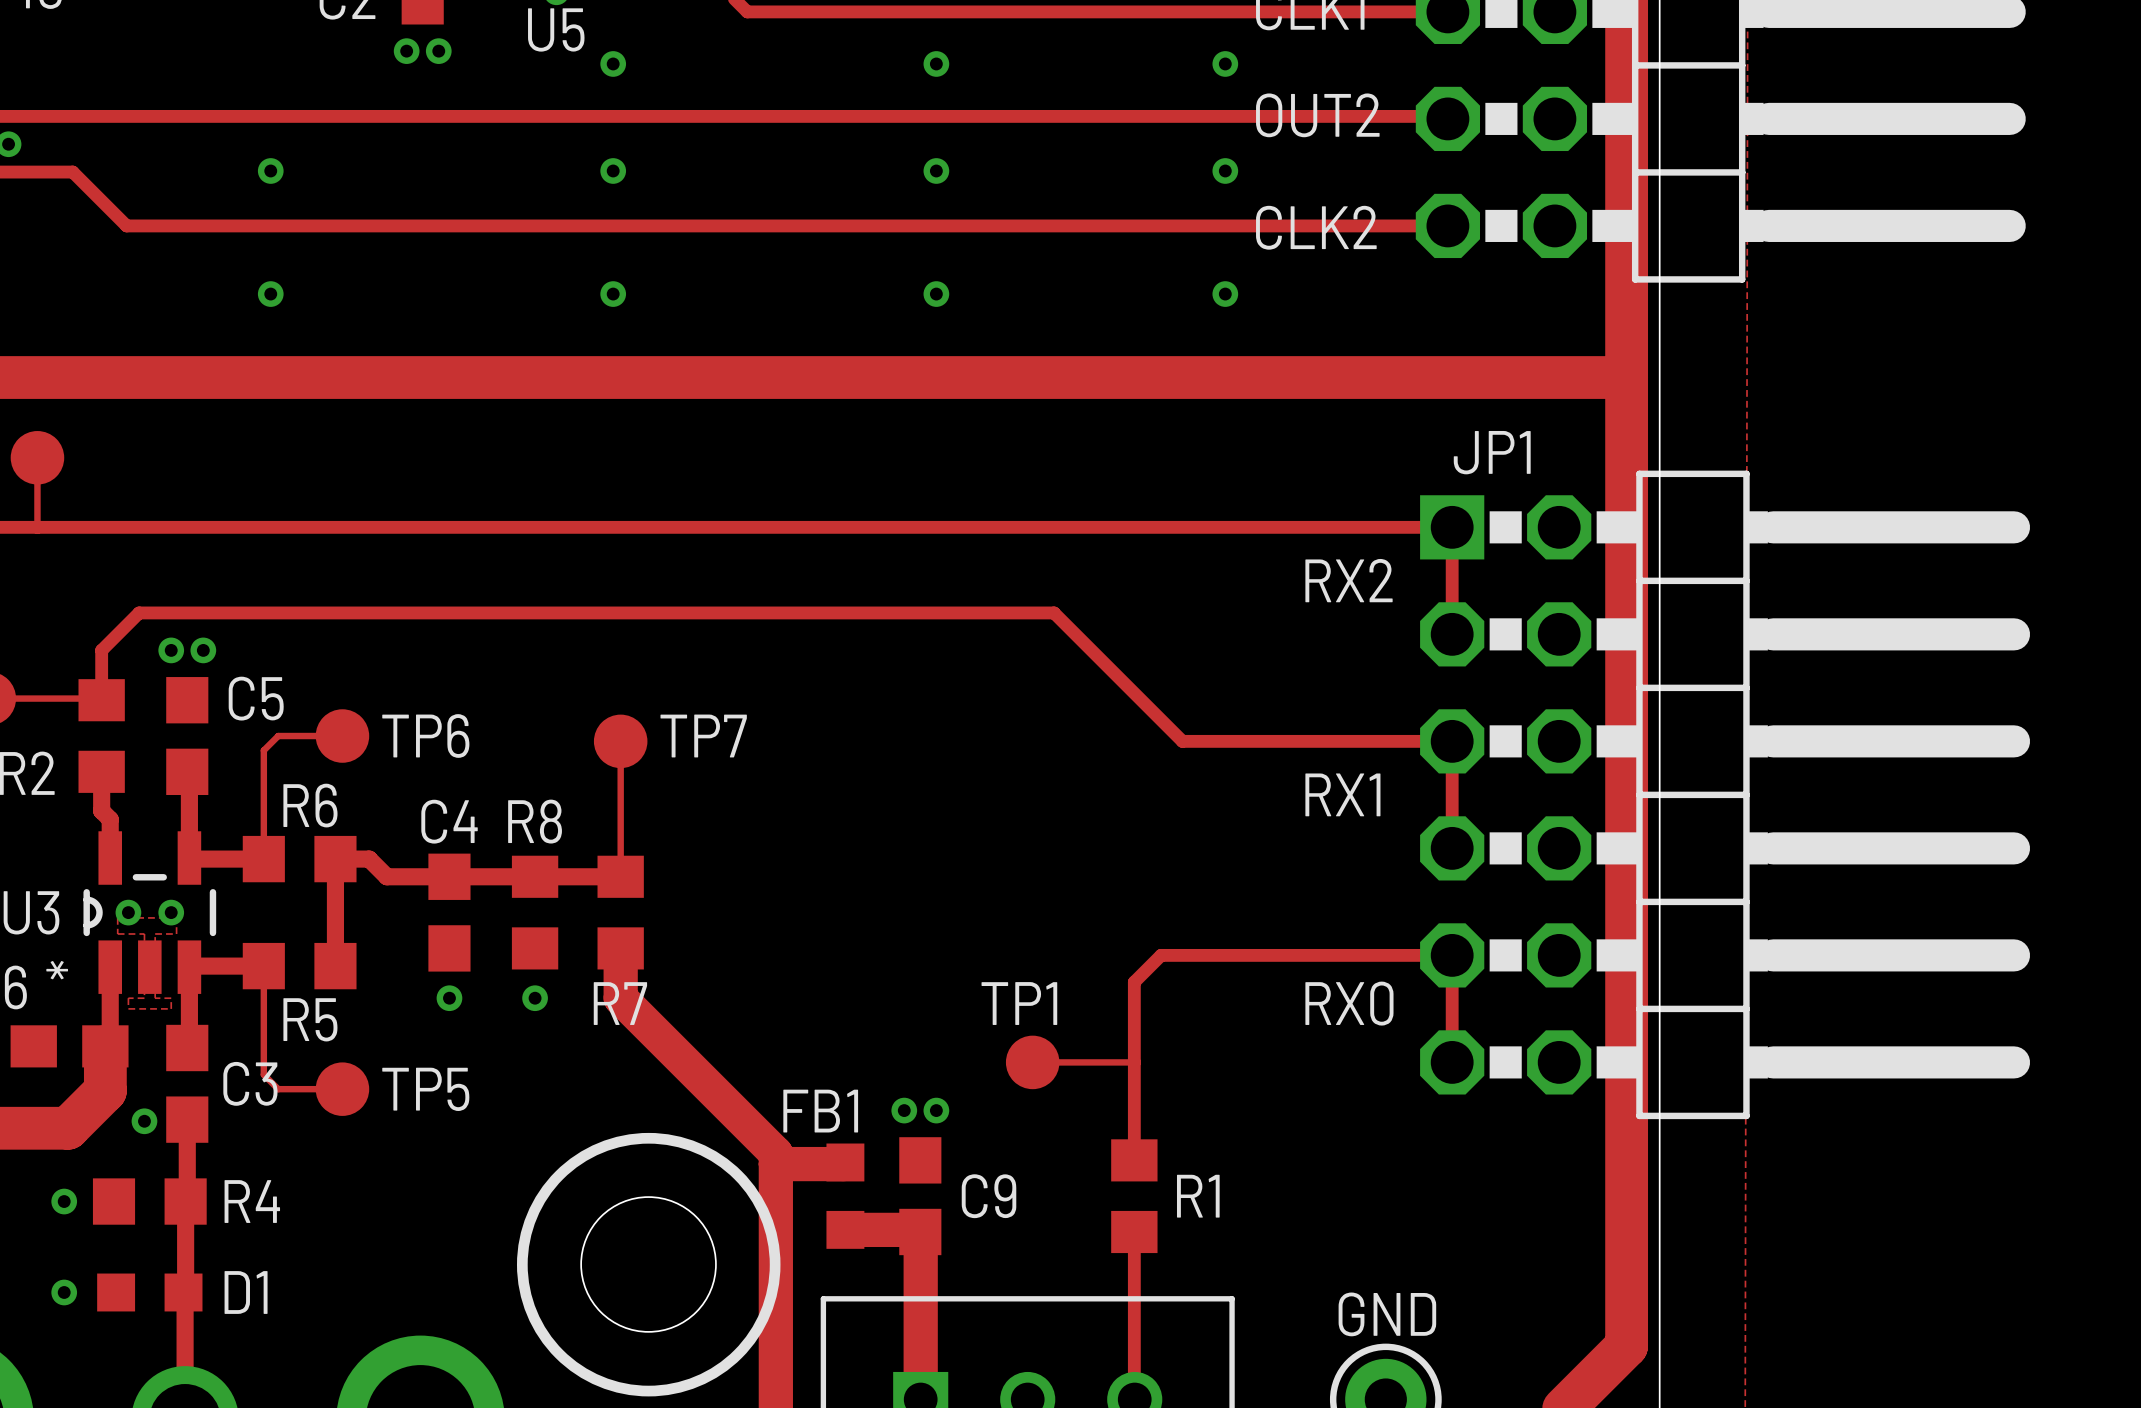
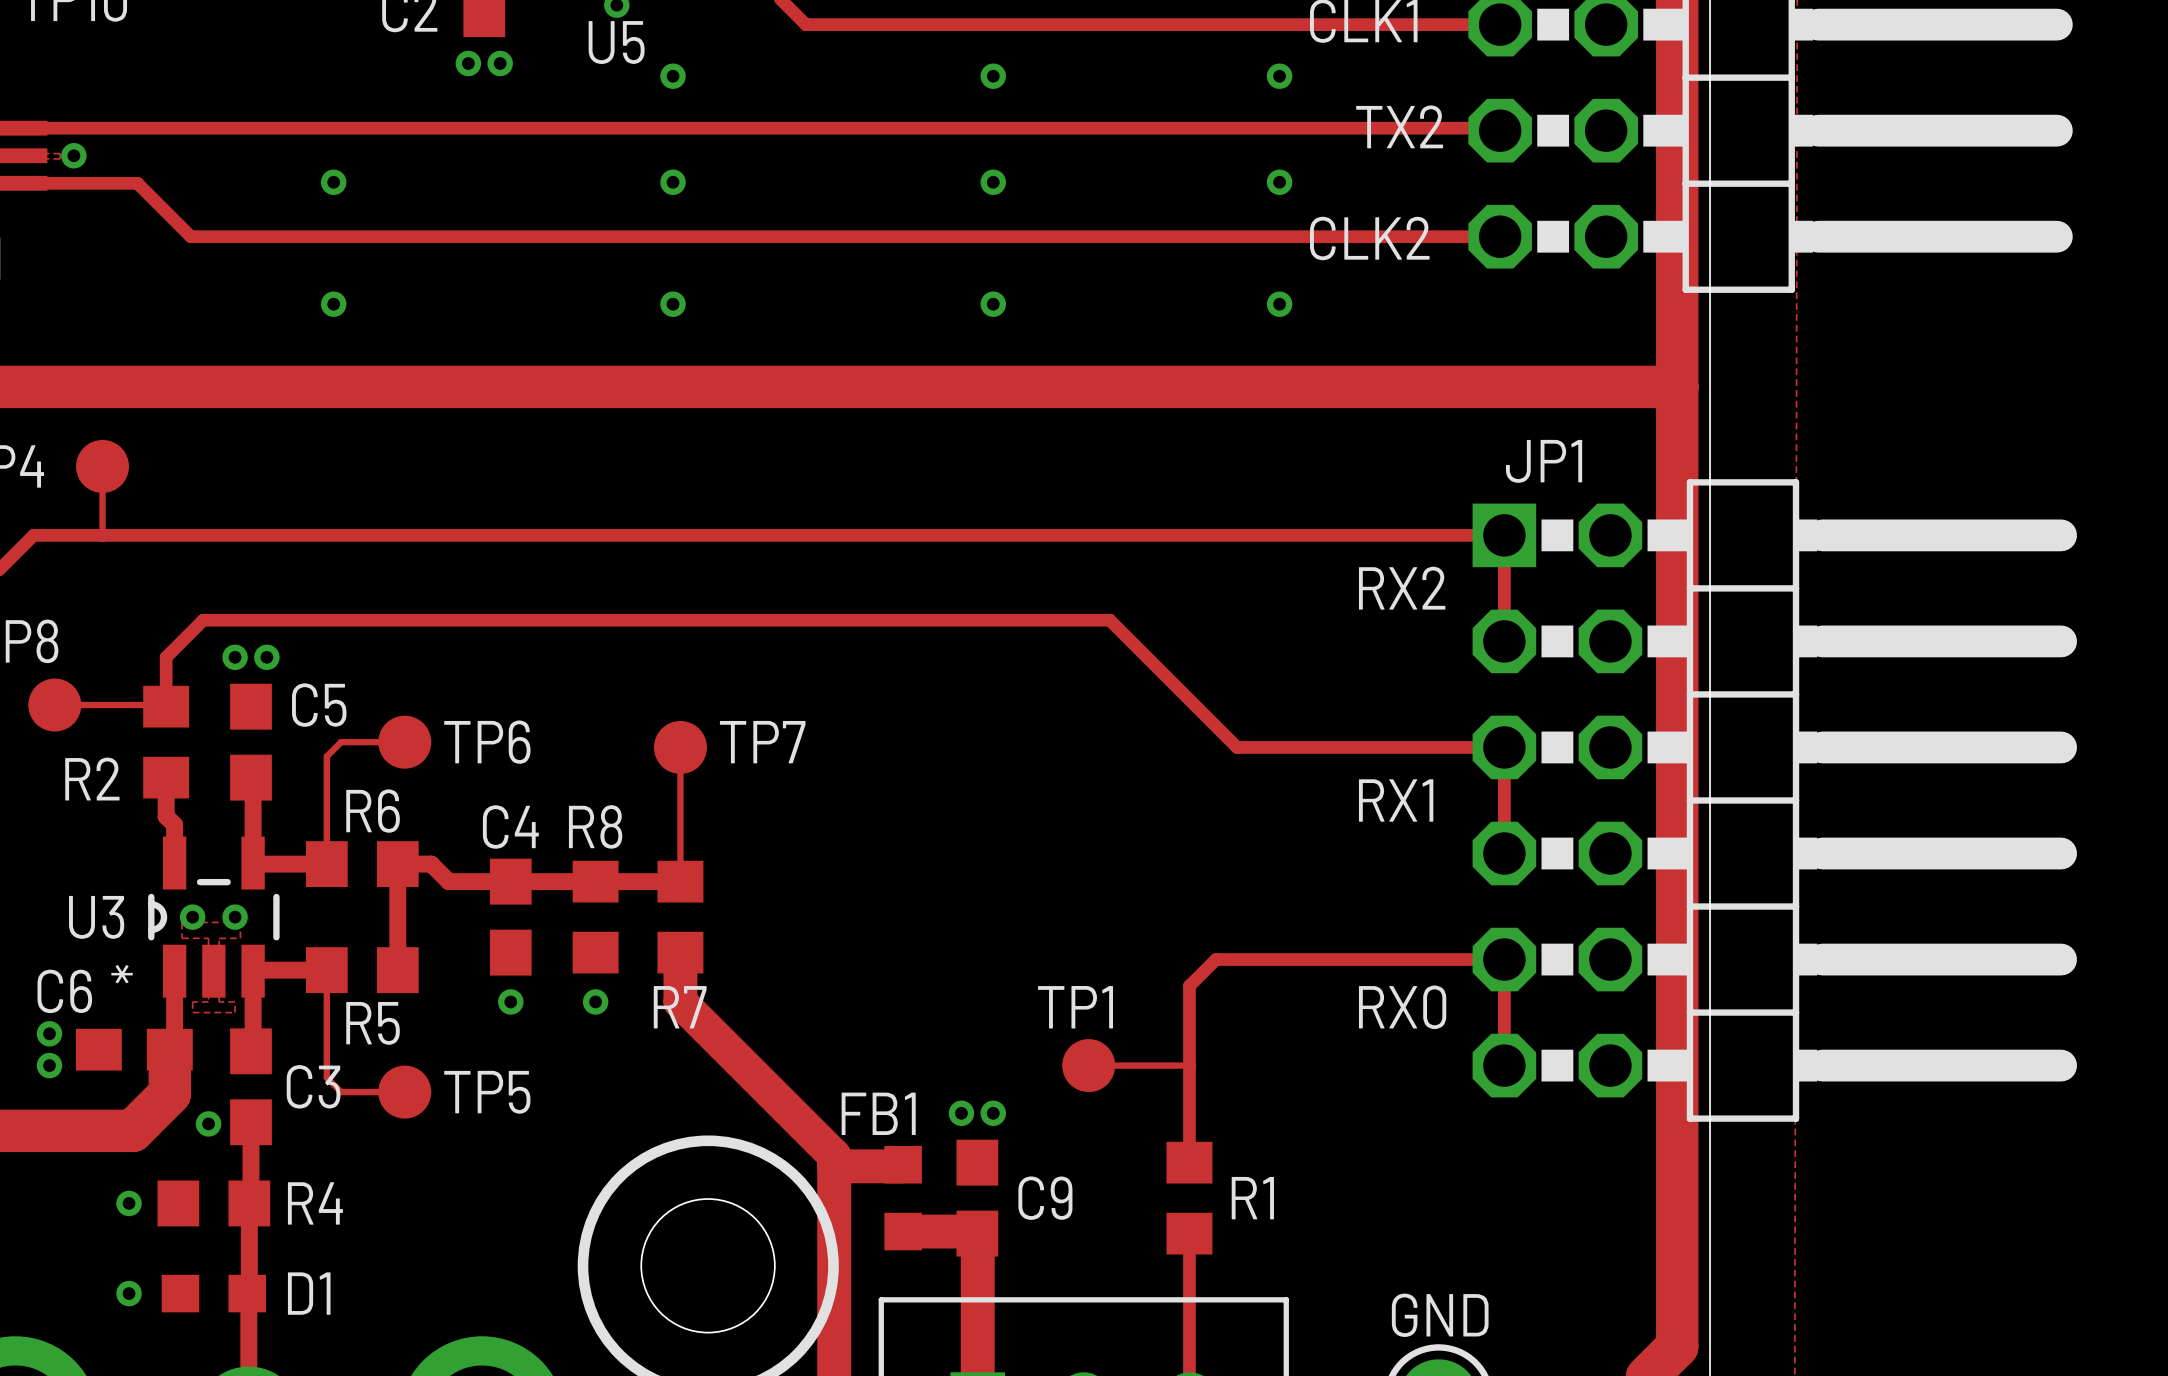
text: OUT2 (1317, 115) -> none
text: none -> TX2 (1399, 126)

